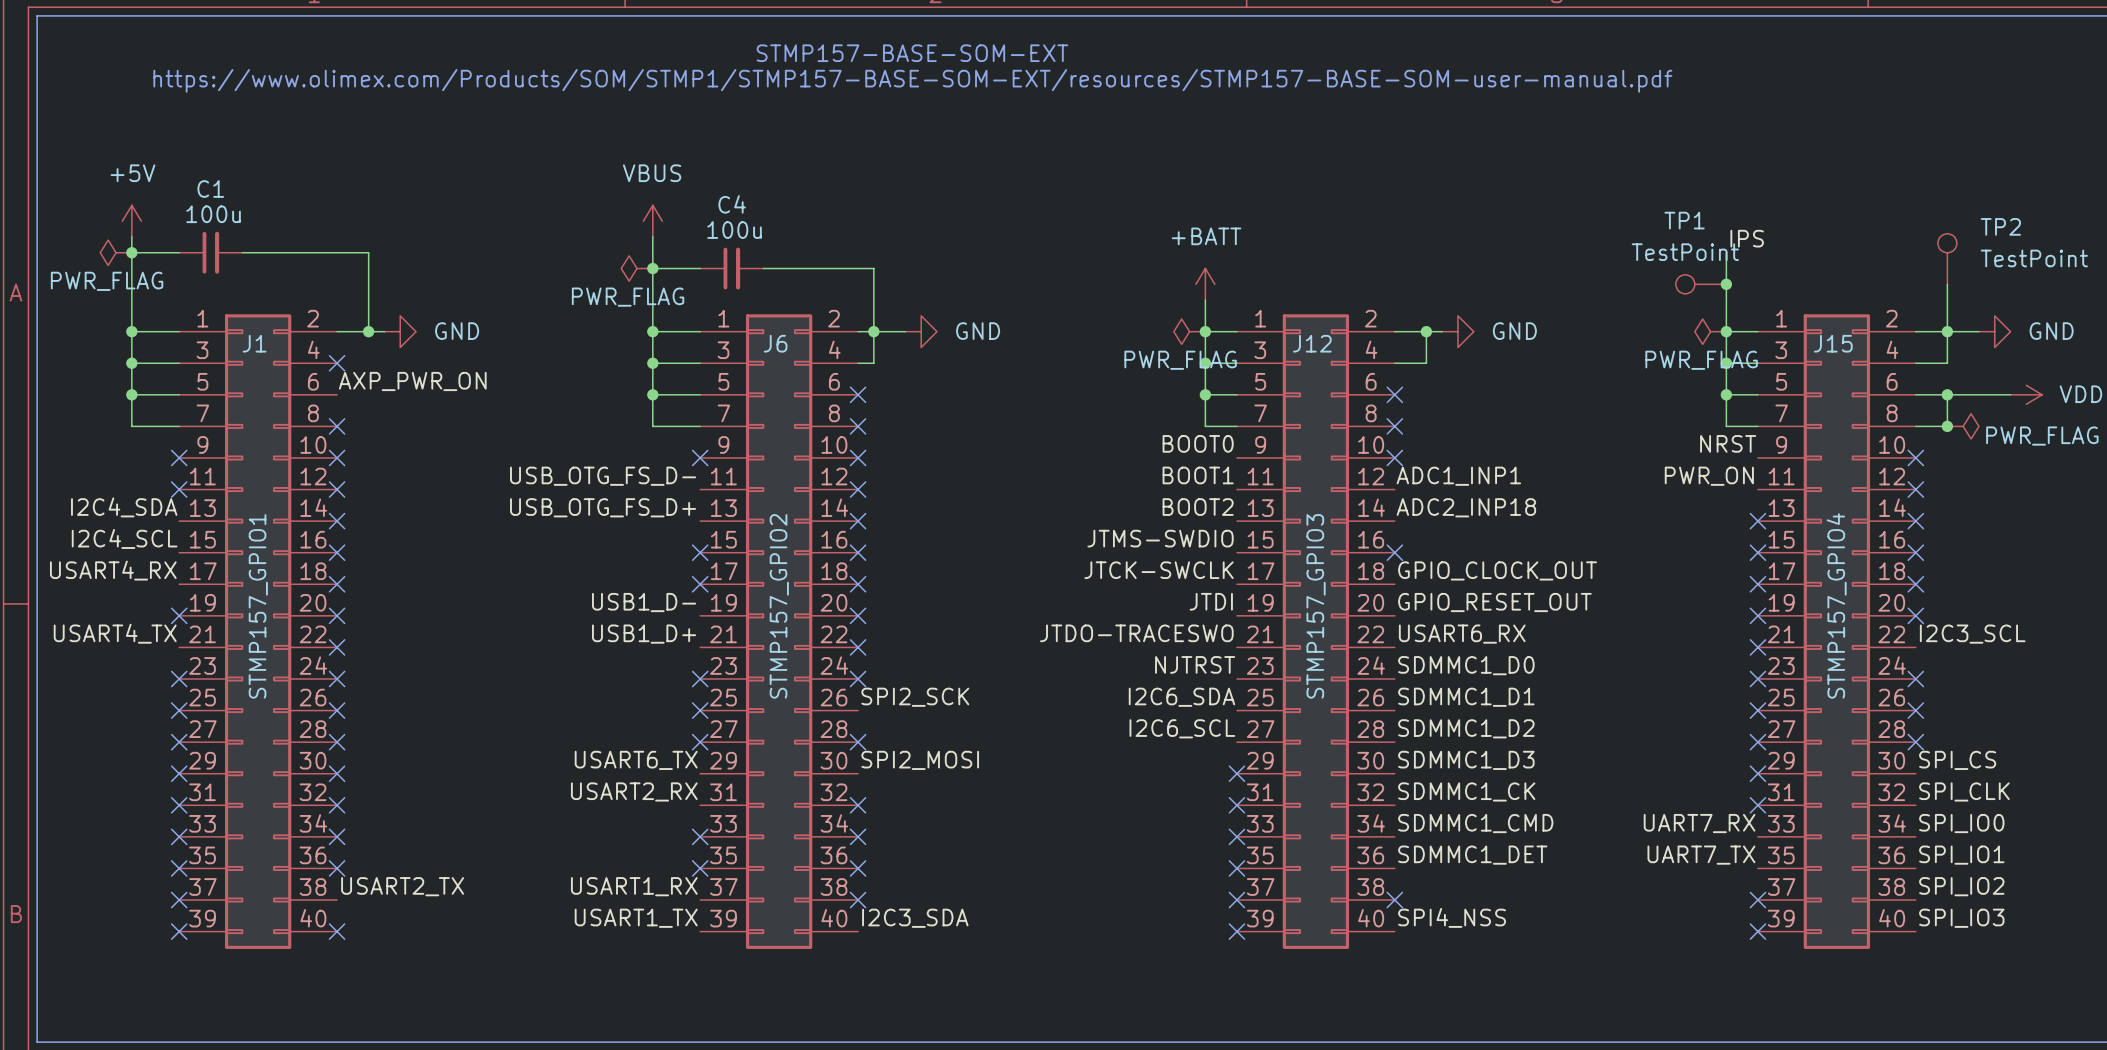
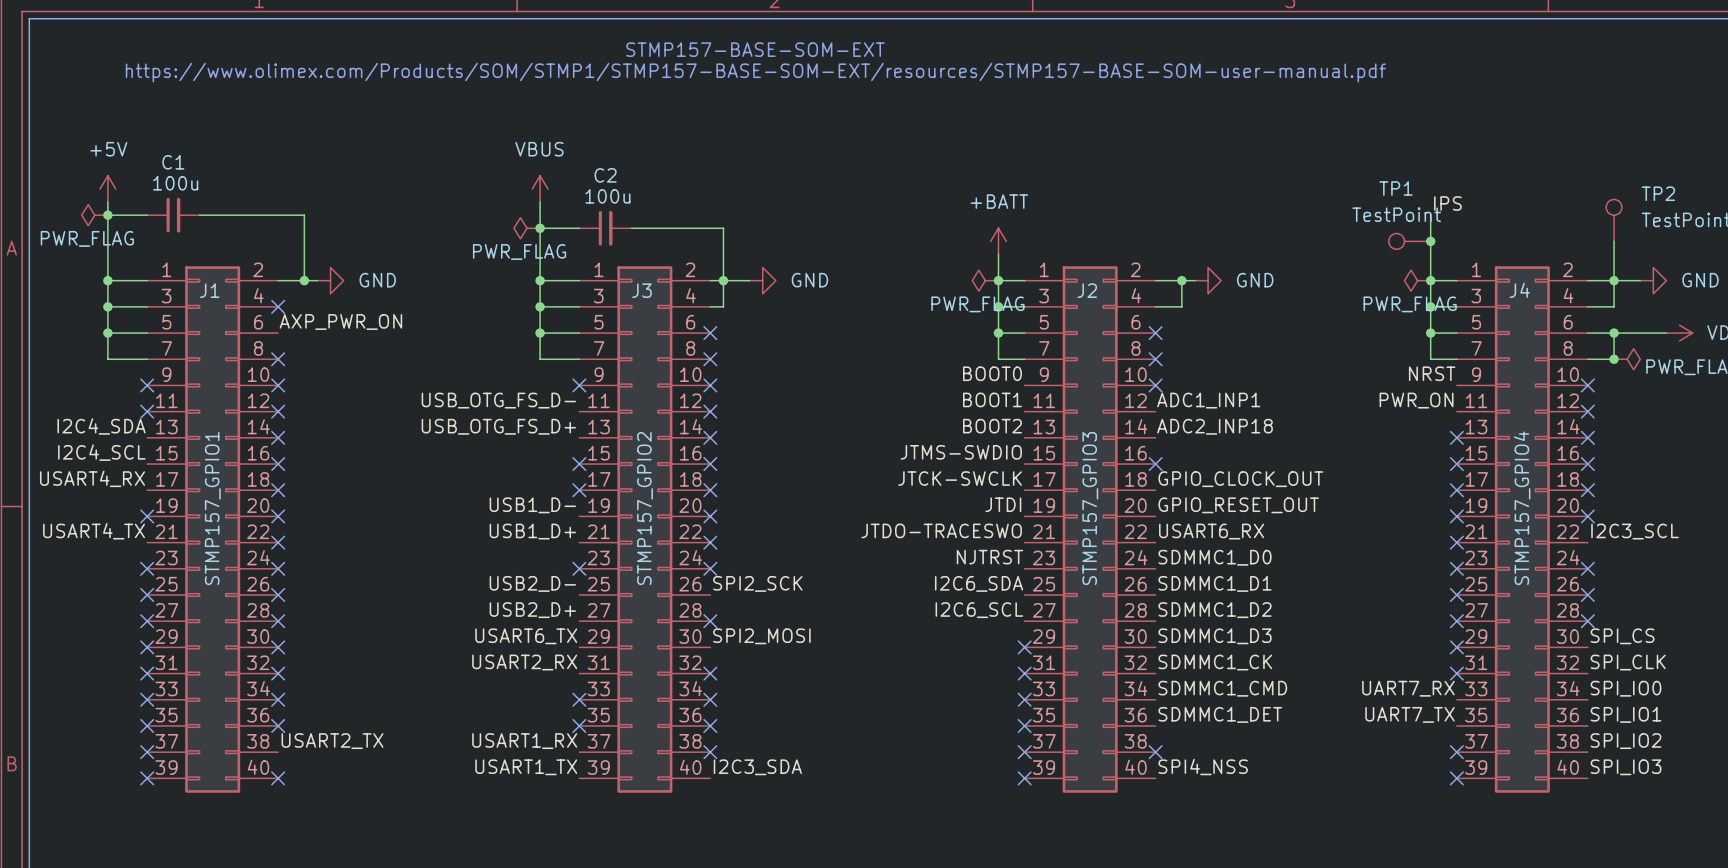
C4 name: C4 (732, 204) -> C2 (605, 175)
J6 name: J6 (775, 343) -> J3 (641, 290)
J12 name: J12 (1312, 343) -> J2 (1087, 290)
J15 name: J15 (1833, 343) -> J4 (1519, 290)
label: none -> USB2_D- (532, 583)
no-connect mark: (700, 710) -> none
label: none -> USB2_D+ (532, 610)
no-connect mark: (700, 742) -> none

